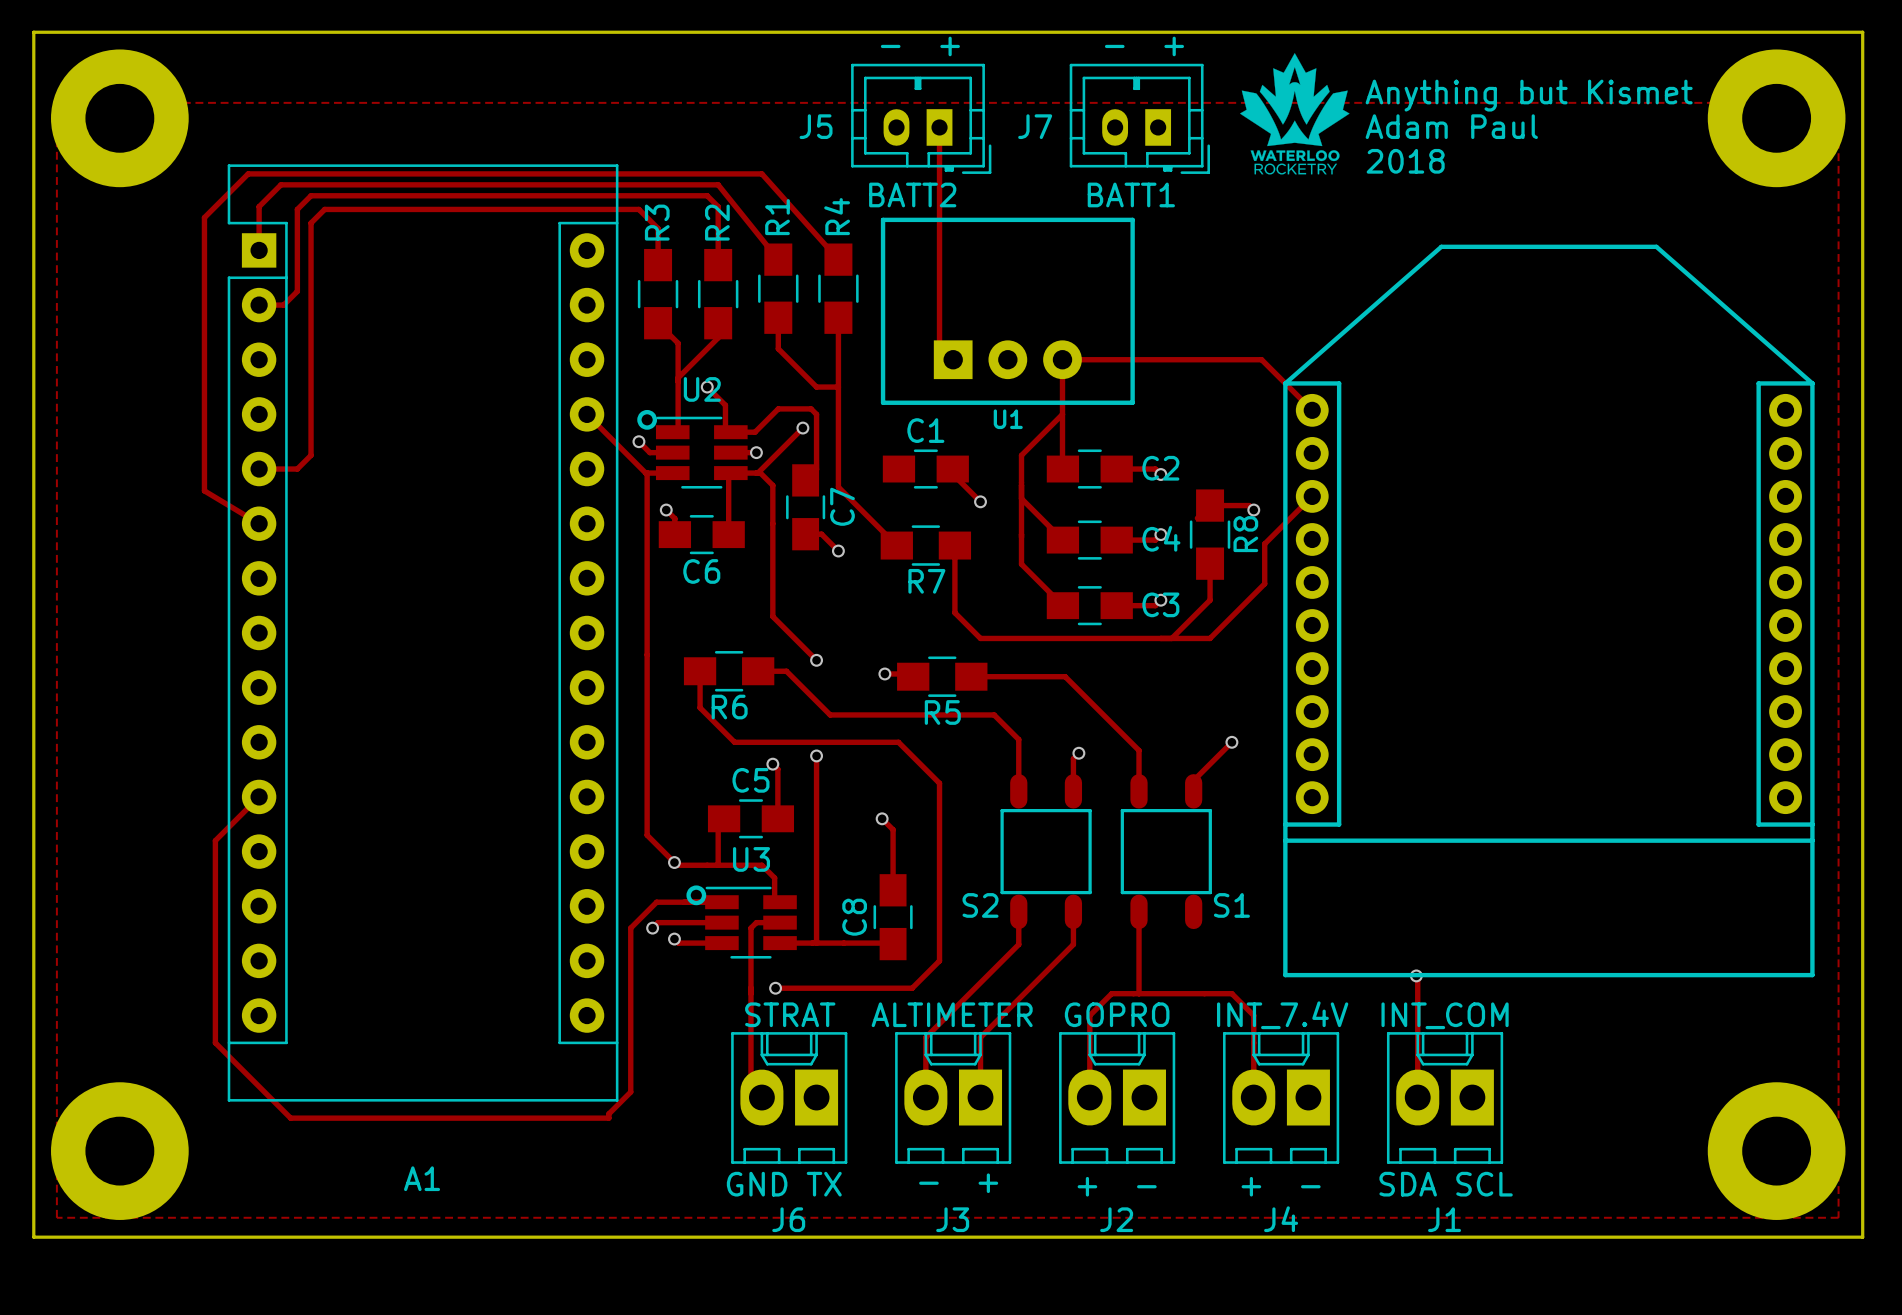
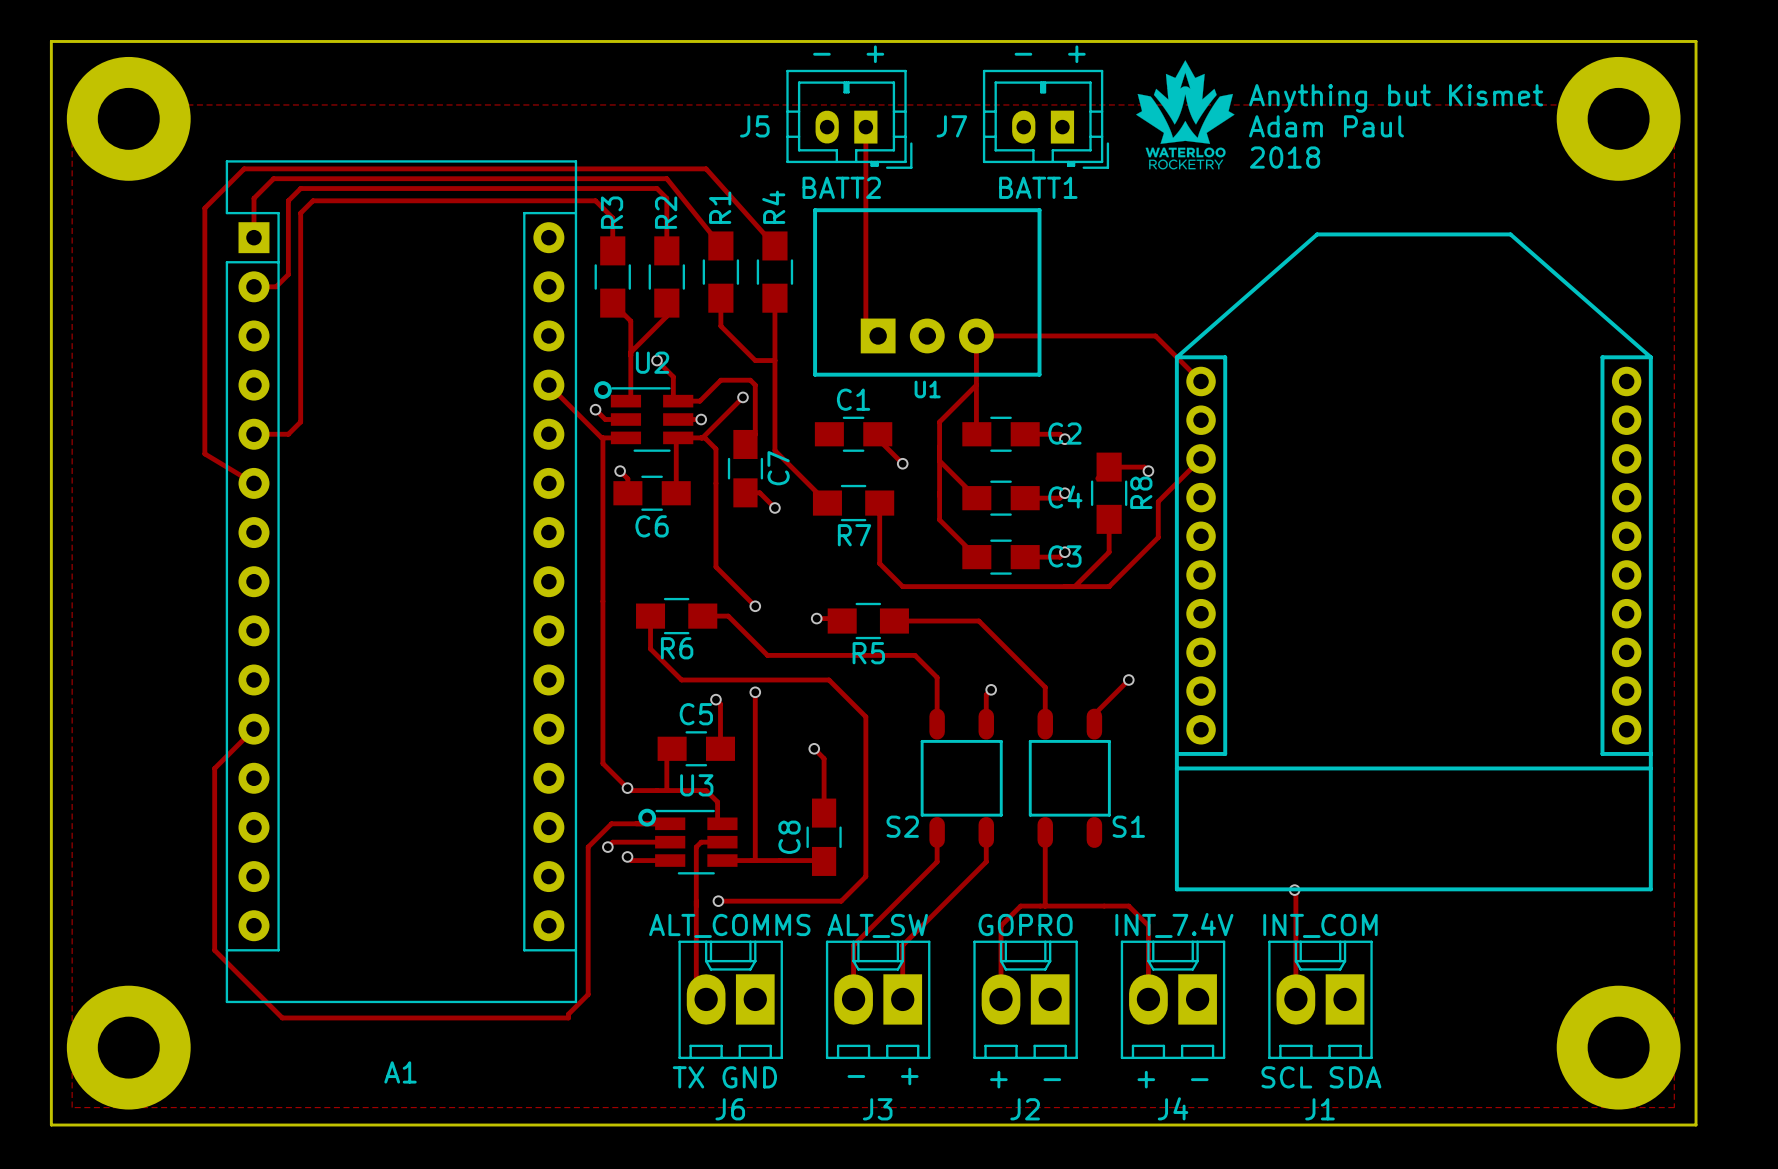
text: STRAT (790, 1014) -> ALT_COMMS (729, 925)
text: ALTIMETER (952, 1014) -> ALT_SW (877, 925)
text: GND TX (784, 1184) -> TX GND (724, 1077)
text: SDA SCL (1446, 1184) -> SCL SDA (1321, 1077)

